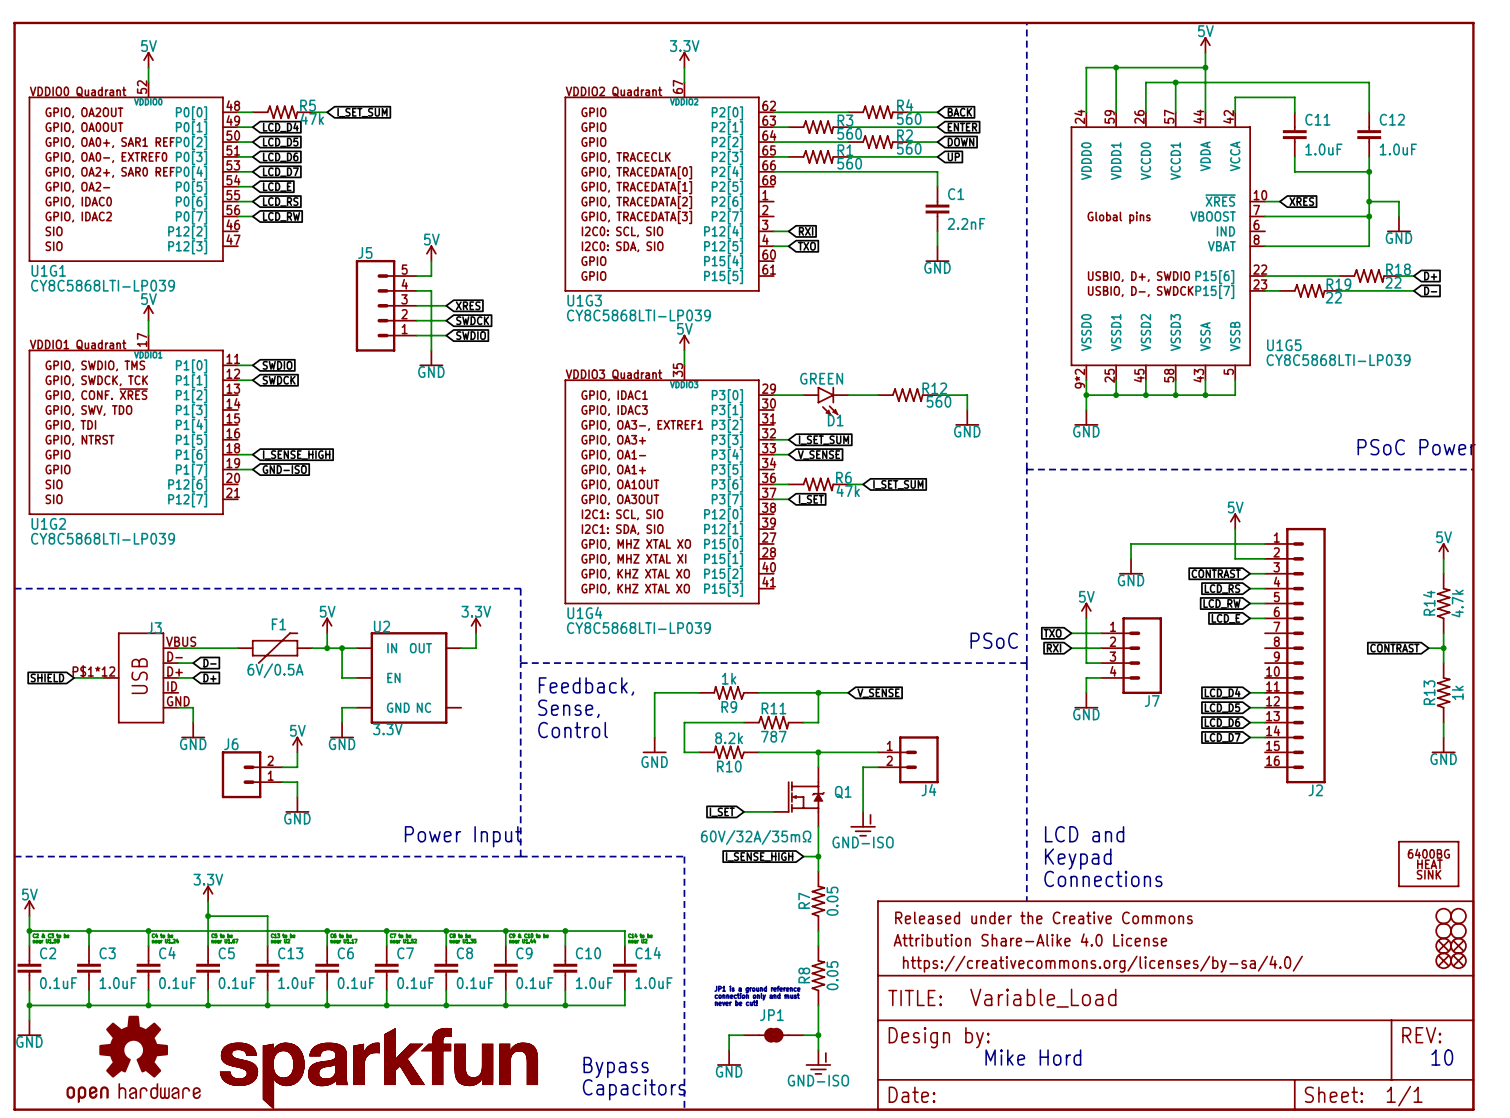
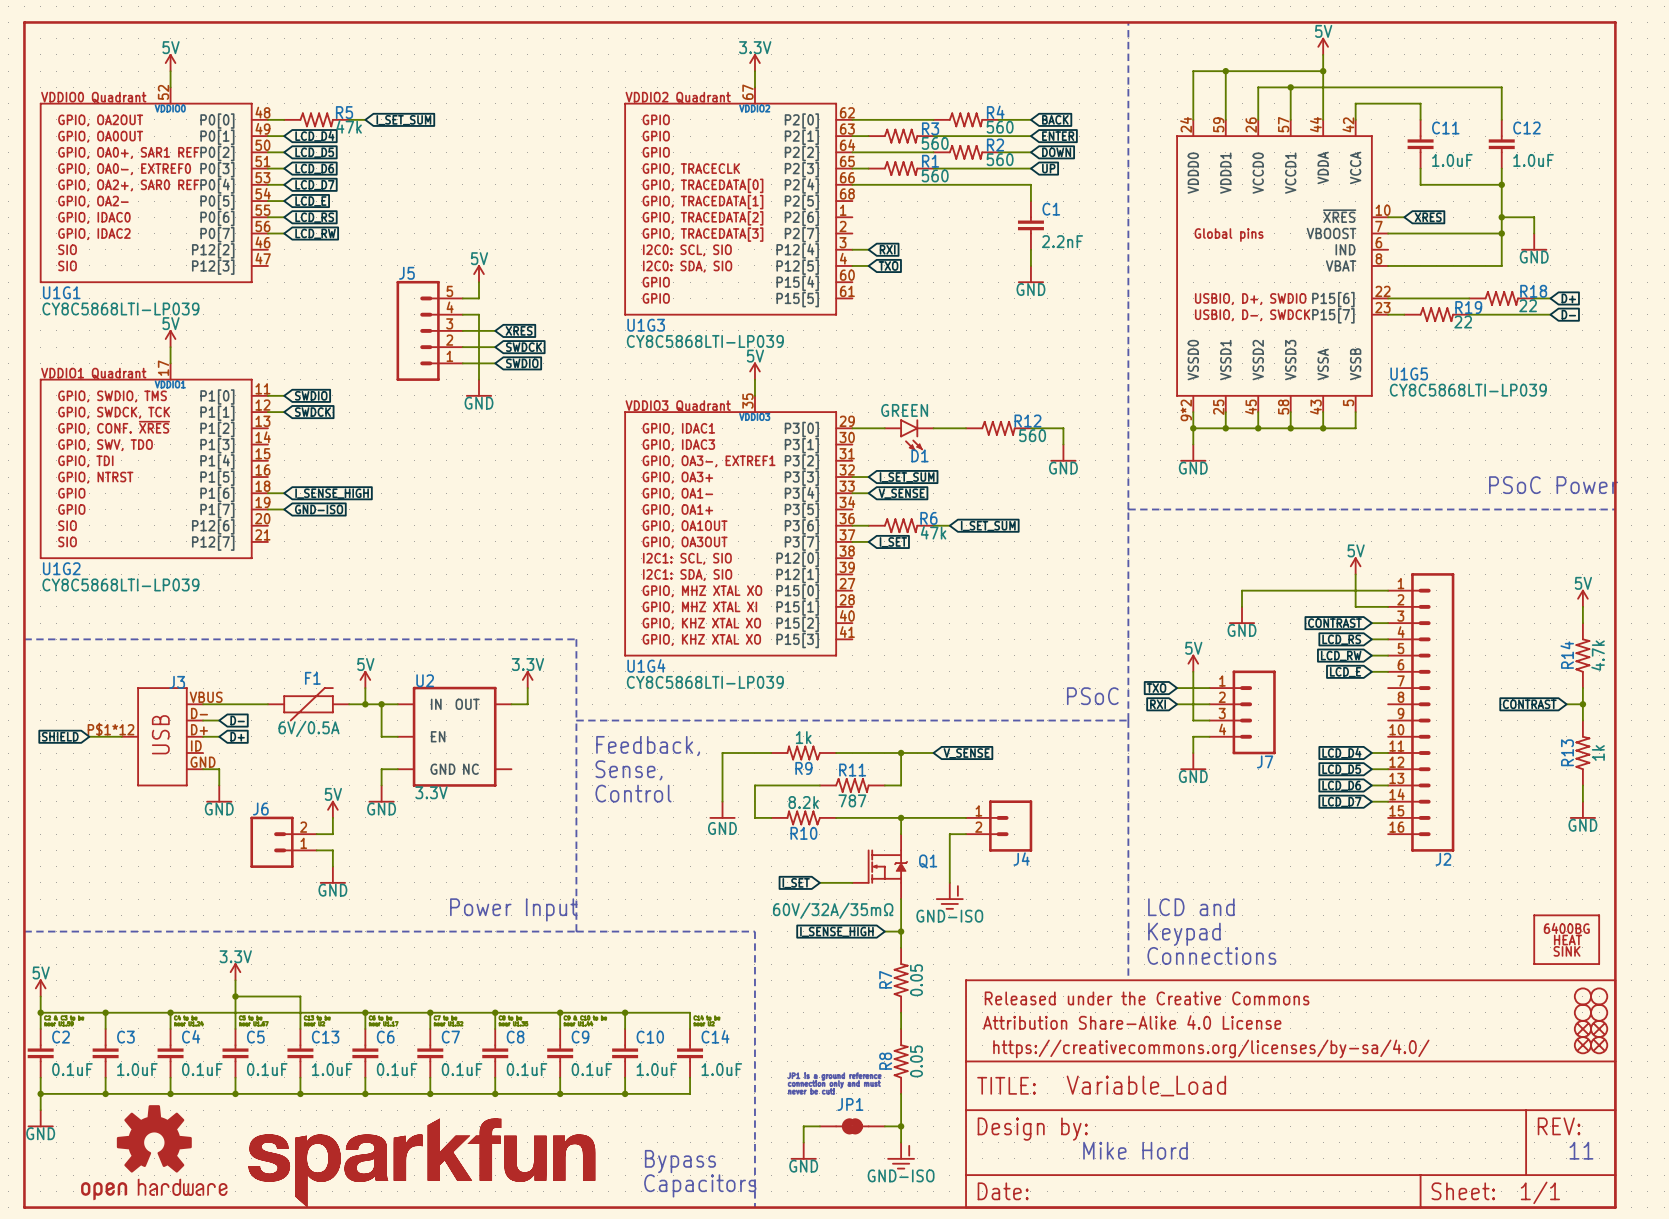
text: 10 (1442, 1057) -> 11 (1581, 1150)

